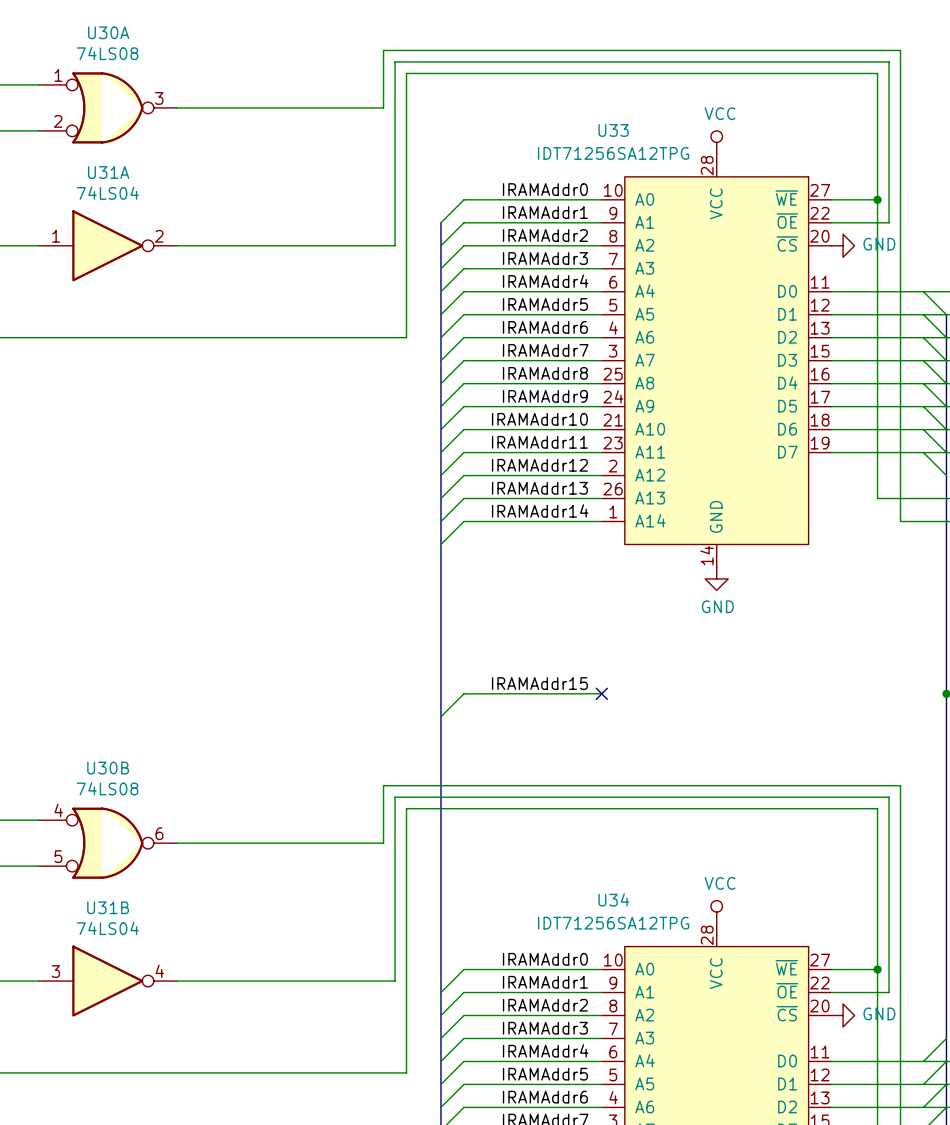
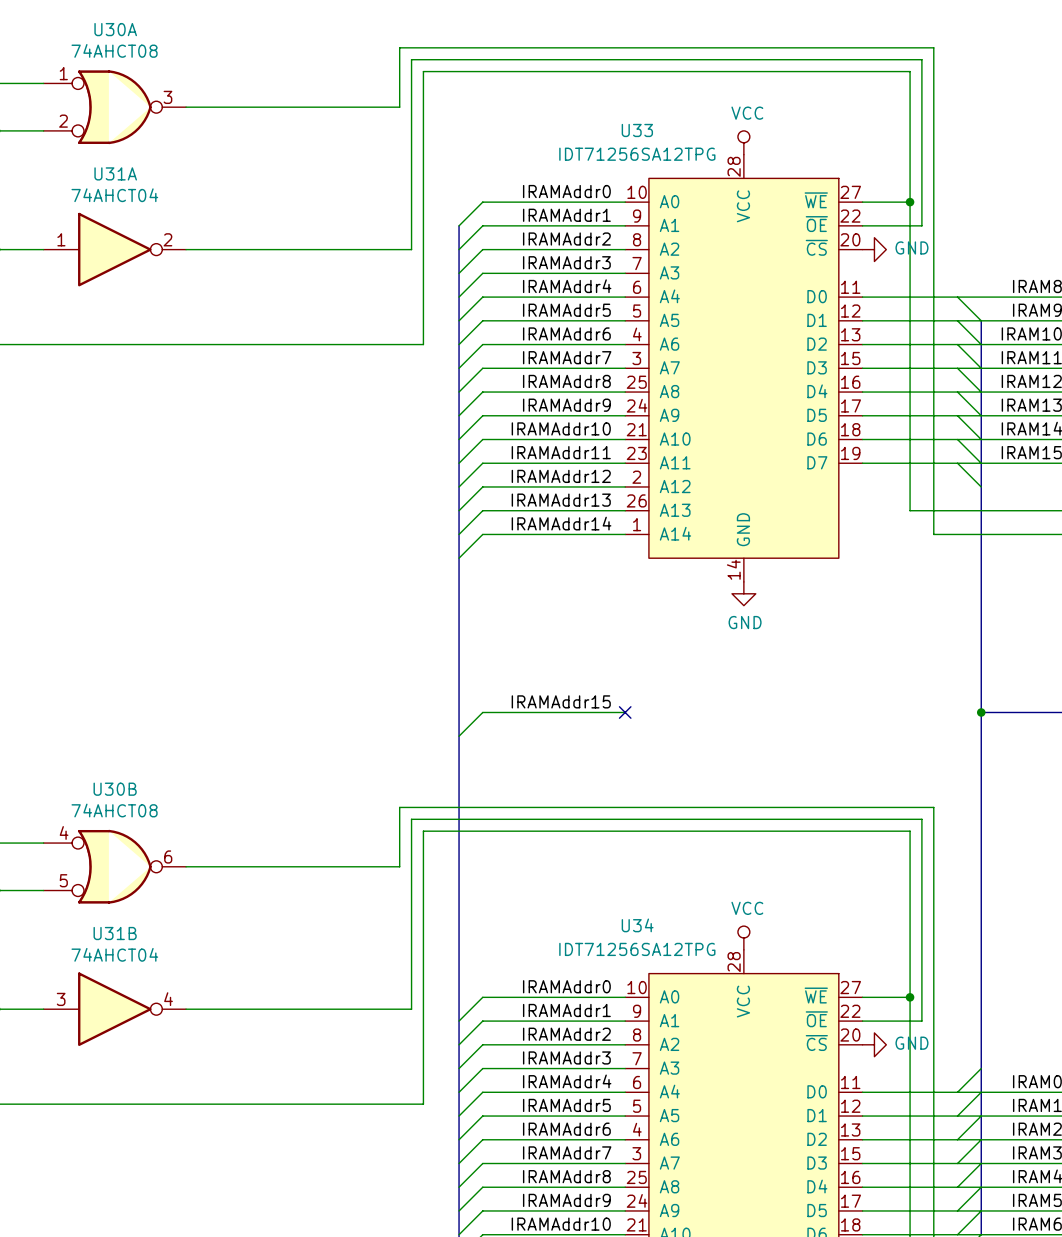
U30A value: 74LS08 (107, 53) -> 74AHCT08 (114, 50)
U31A value: 74LS04 (107, 193) -> 74AHCT04 (114, 195)
U30B value: 74LS08 (107, 788) -> 74AHCT08 (114, 810)
U31B value: 74LS04 (107, 928) -> 74AHCT04 (114, 954)

